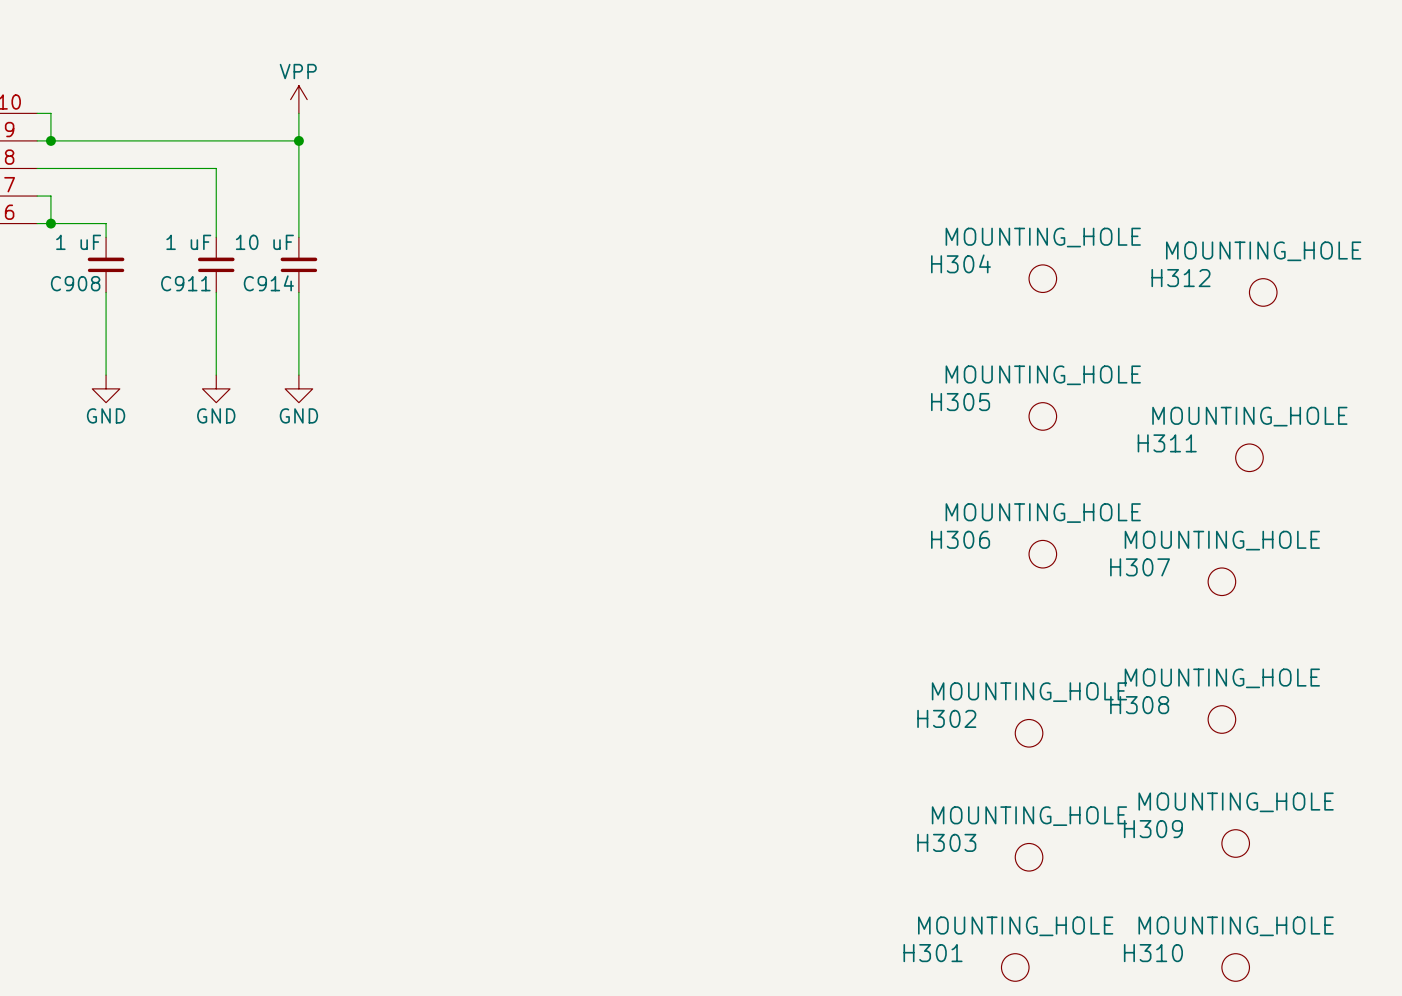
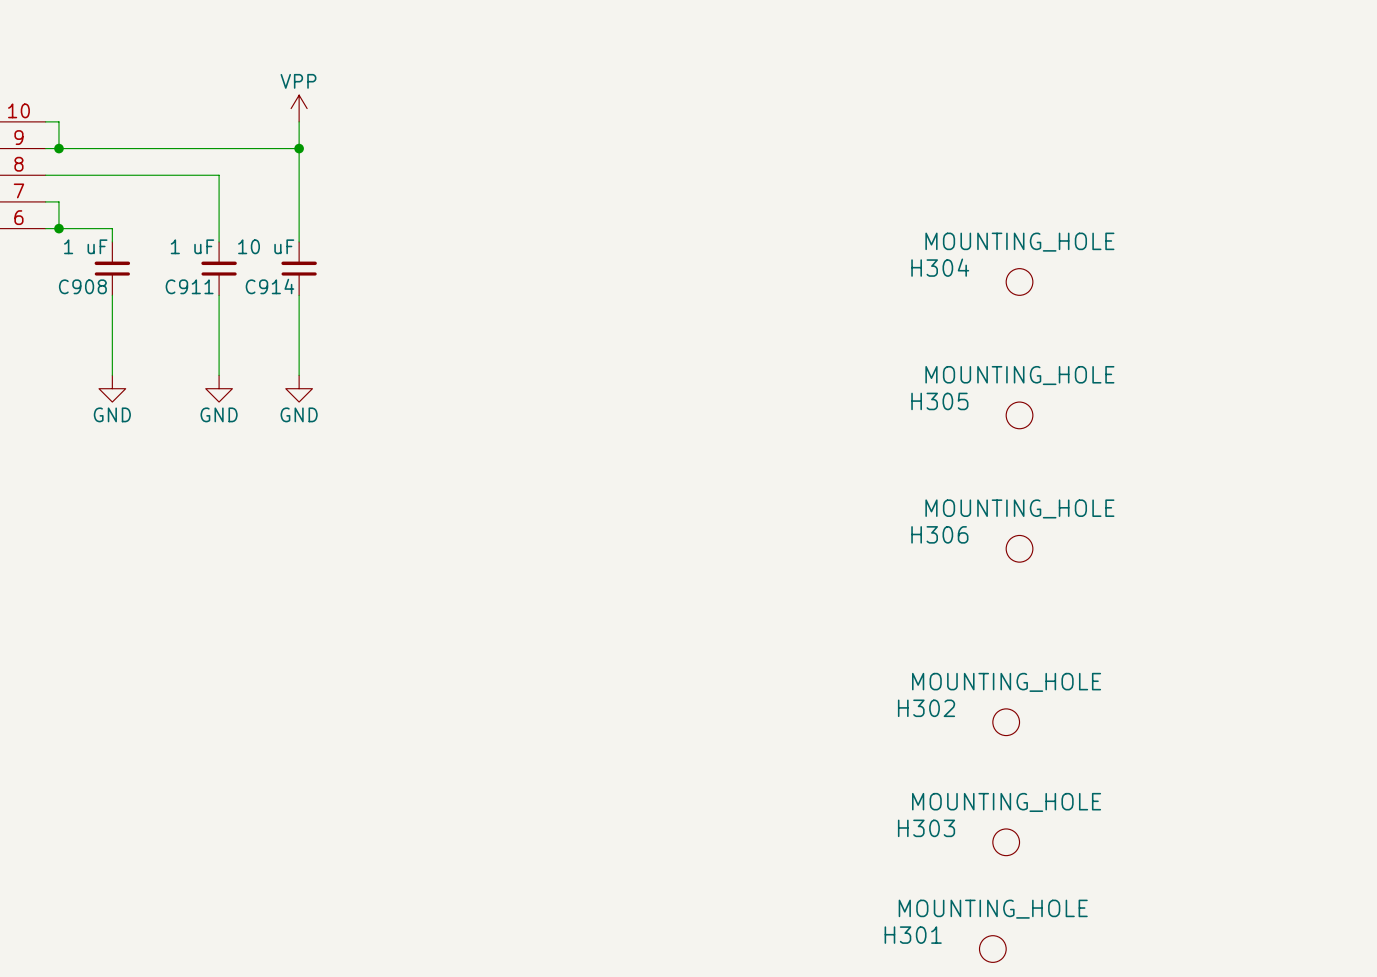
H312: MOUNTING_HOLE (1263, 292) -> none
H311: MOUNTING_HOLE (1249, 457) -> none
H307: MOUNTING_HOLE (1221, 581) -> none
H308: MOUNTING_HOLE (1221, 719) -> none
H309: MOUNTING_HOLE (1235, 843) -> none
H310: MOUNTING_HOLE (1235, 967) -> none

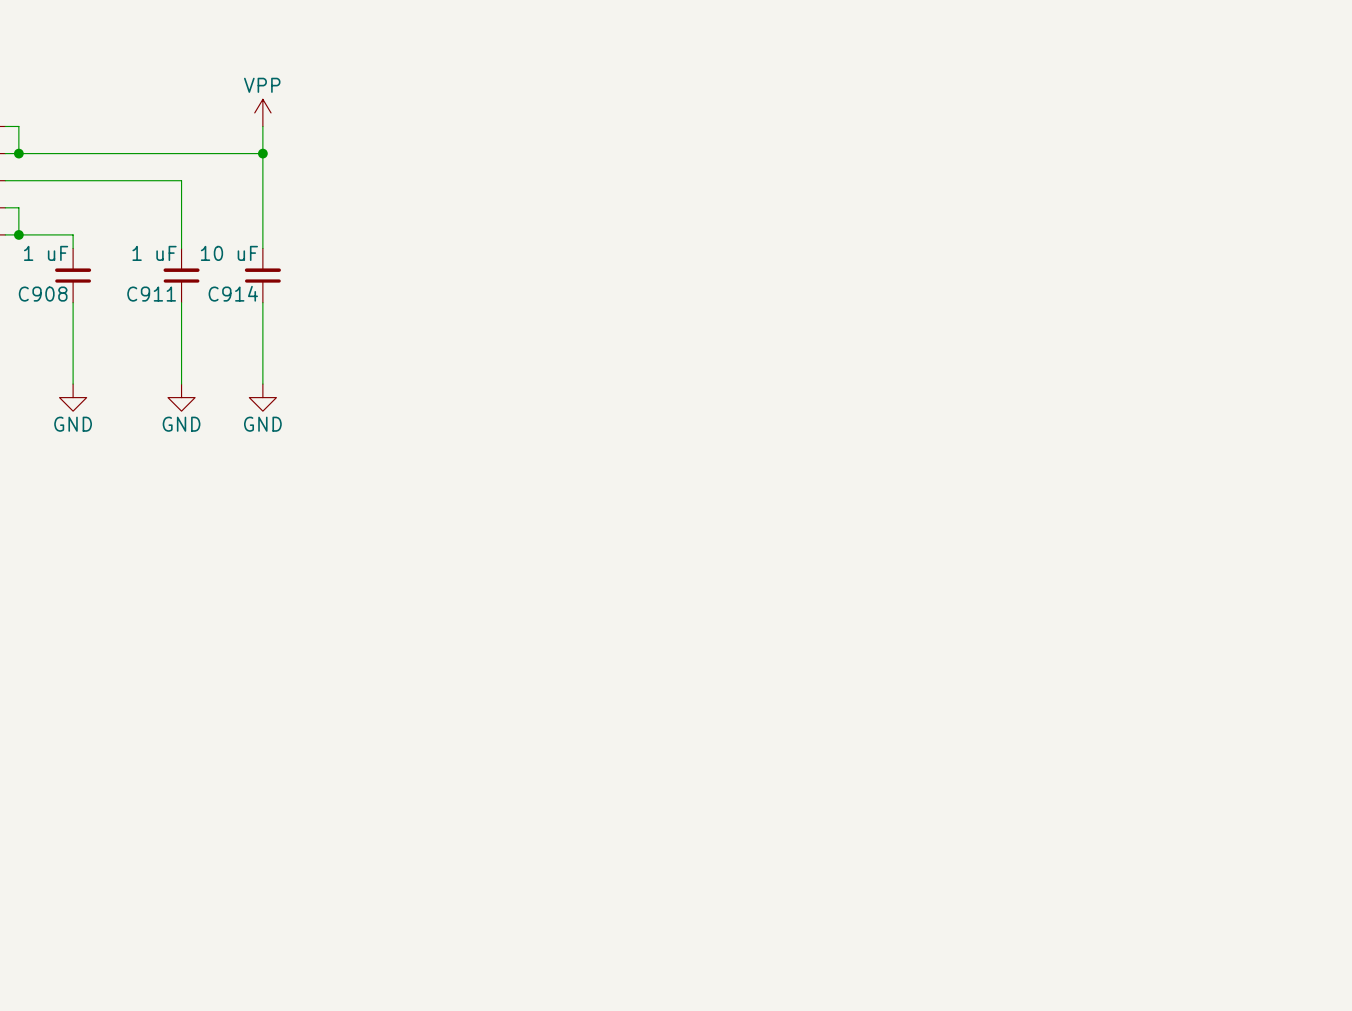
H304: MOUNTING_HOLE (1019, 281) -> none
H305: MOUNTING_HOLE (1019, 415) -> none
H306: MOUNTING_HOLE (1019, 548) -> none
H302: MOUNTING_HOLE (1006, 722) -> none
H303: MOUNTING_HOLE (1006, 842) -> none
H301: MOUNTING_HOLE (992, 949) -> none

